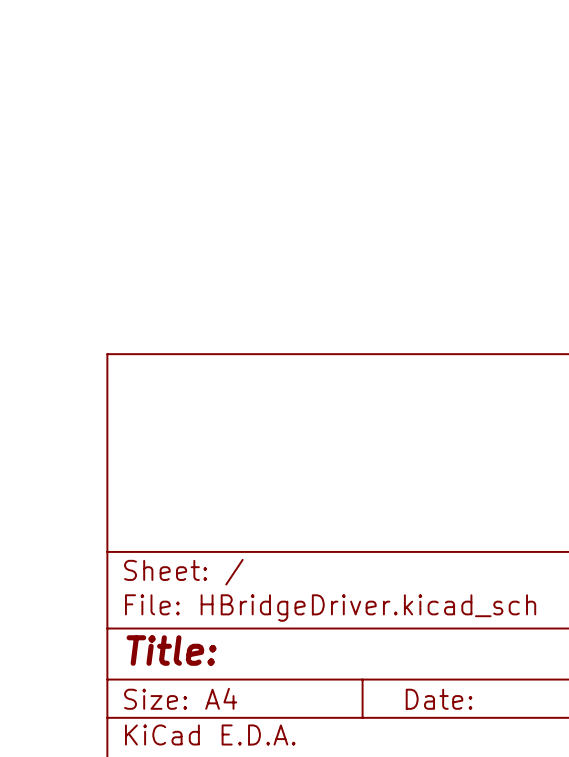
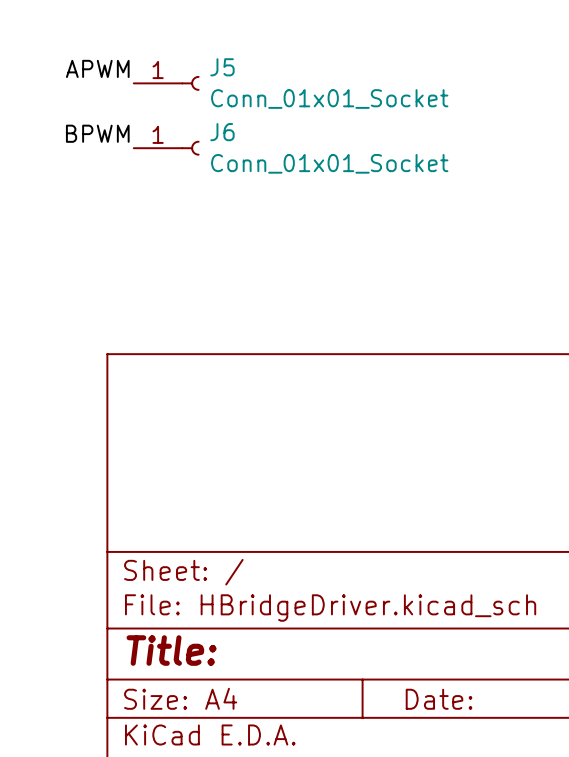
label: none -> APWM (97, 68)
J5: none -> Conn_01x01_Socket (166, 83)
label: none -> BPWM (97, 133)
J6: none -> Conn_01x01_Socket (166, 148)

